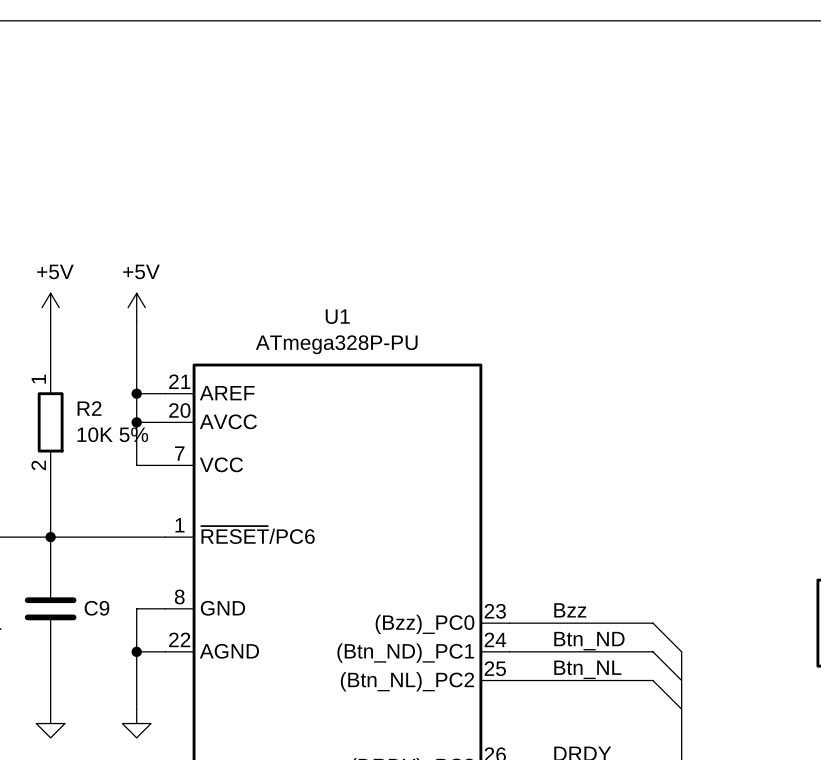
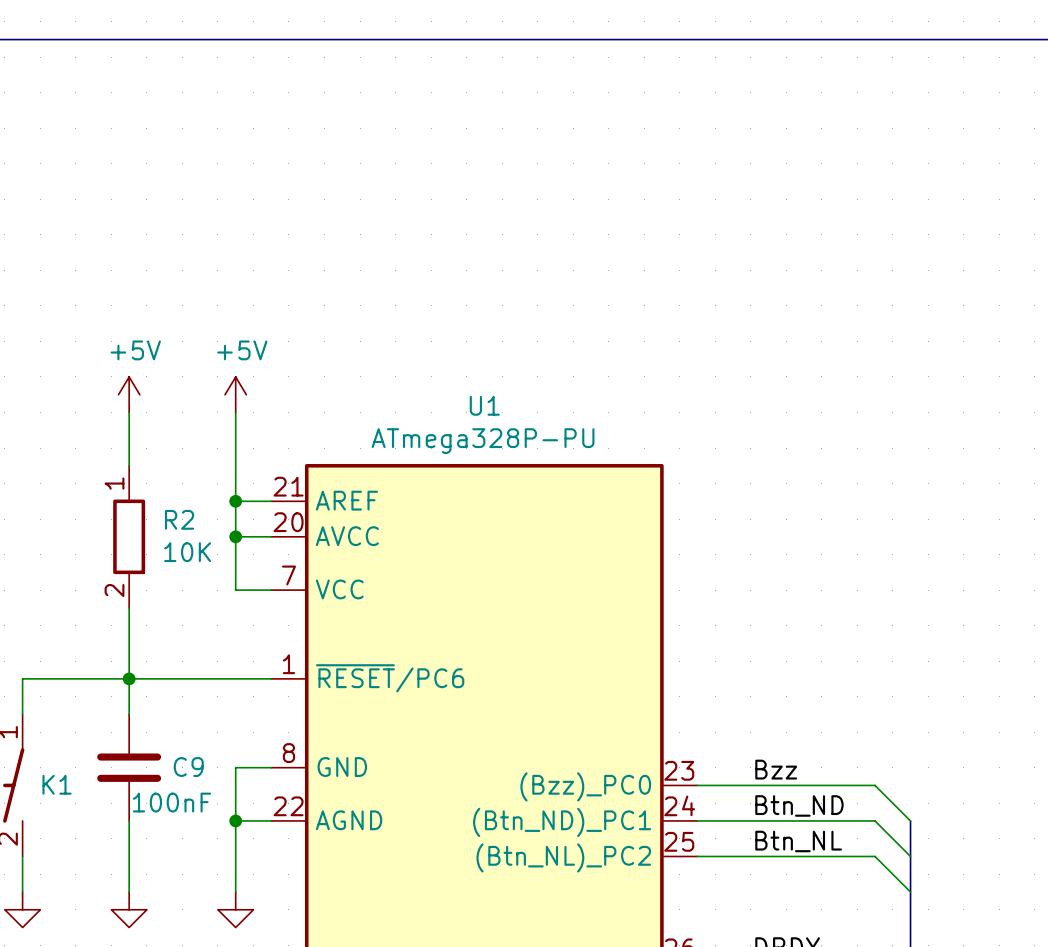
R2 value: 10K 5% (112, 434) -> 10K (187, 552)
C9 value: none -> 100nF (171, 802)

